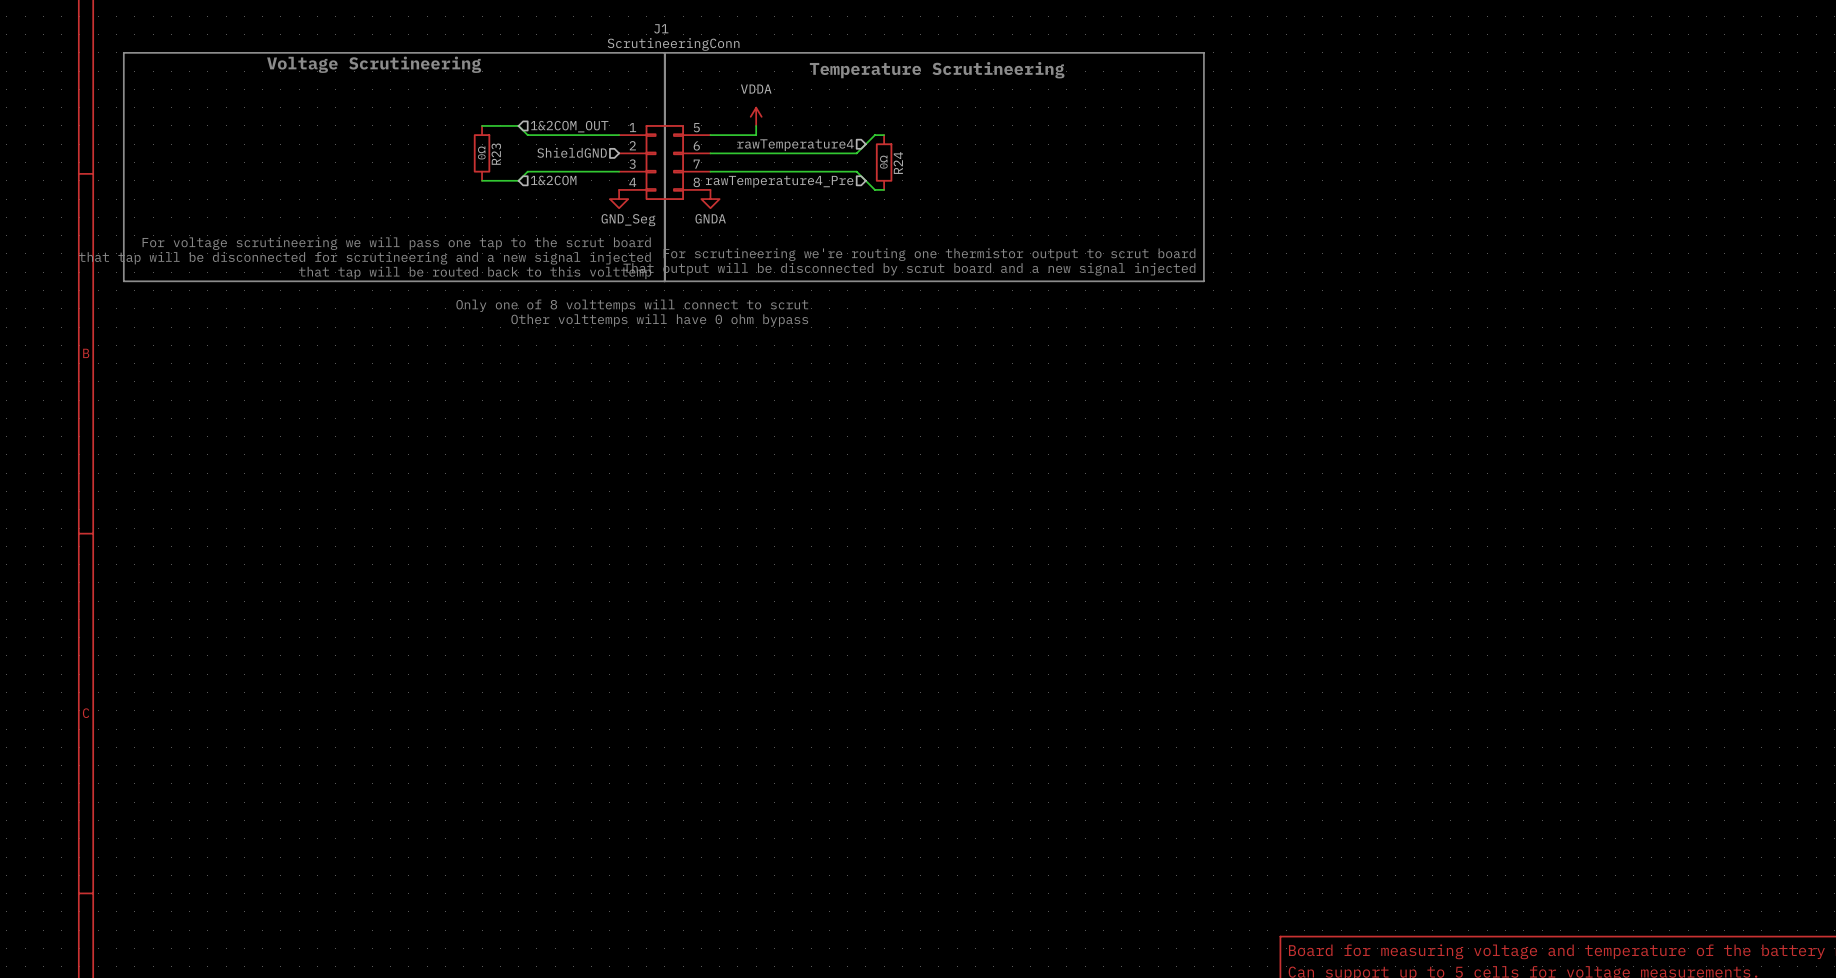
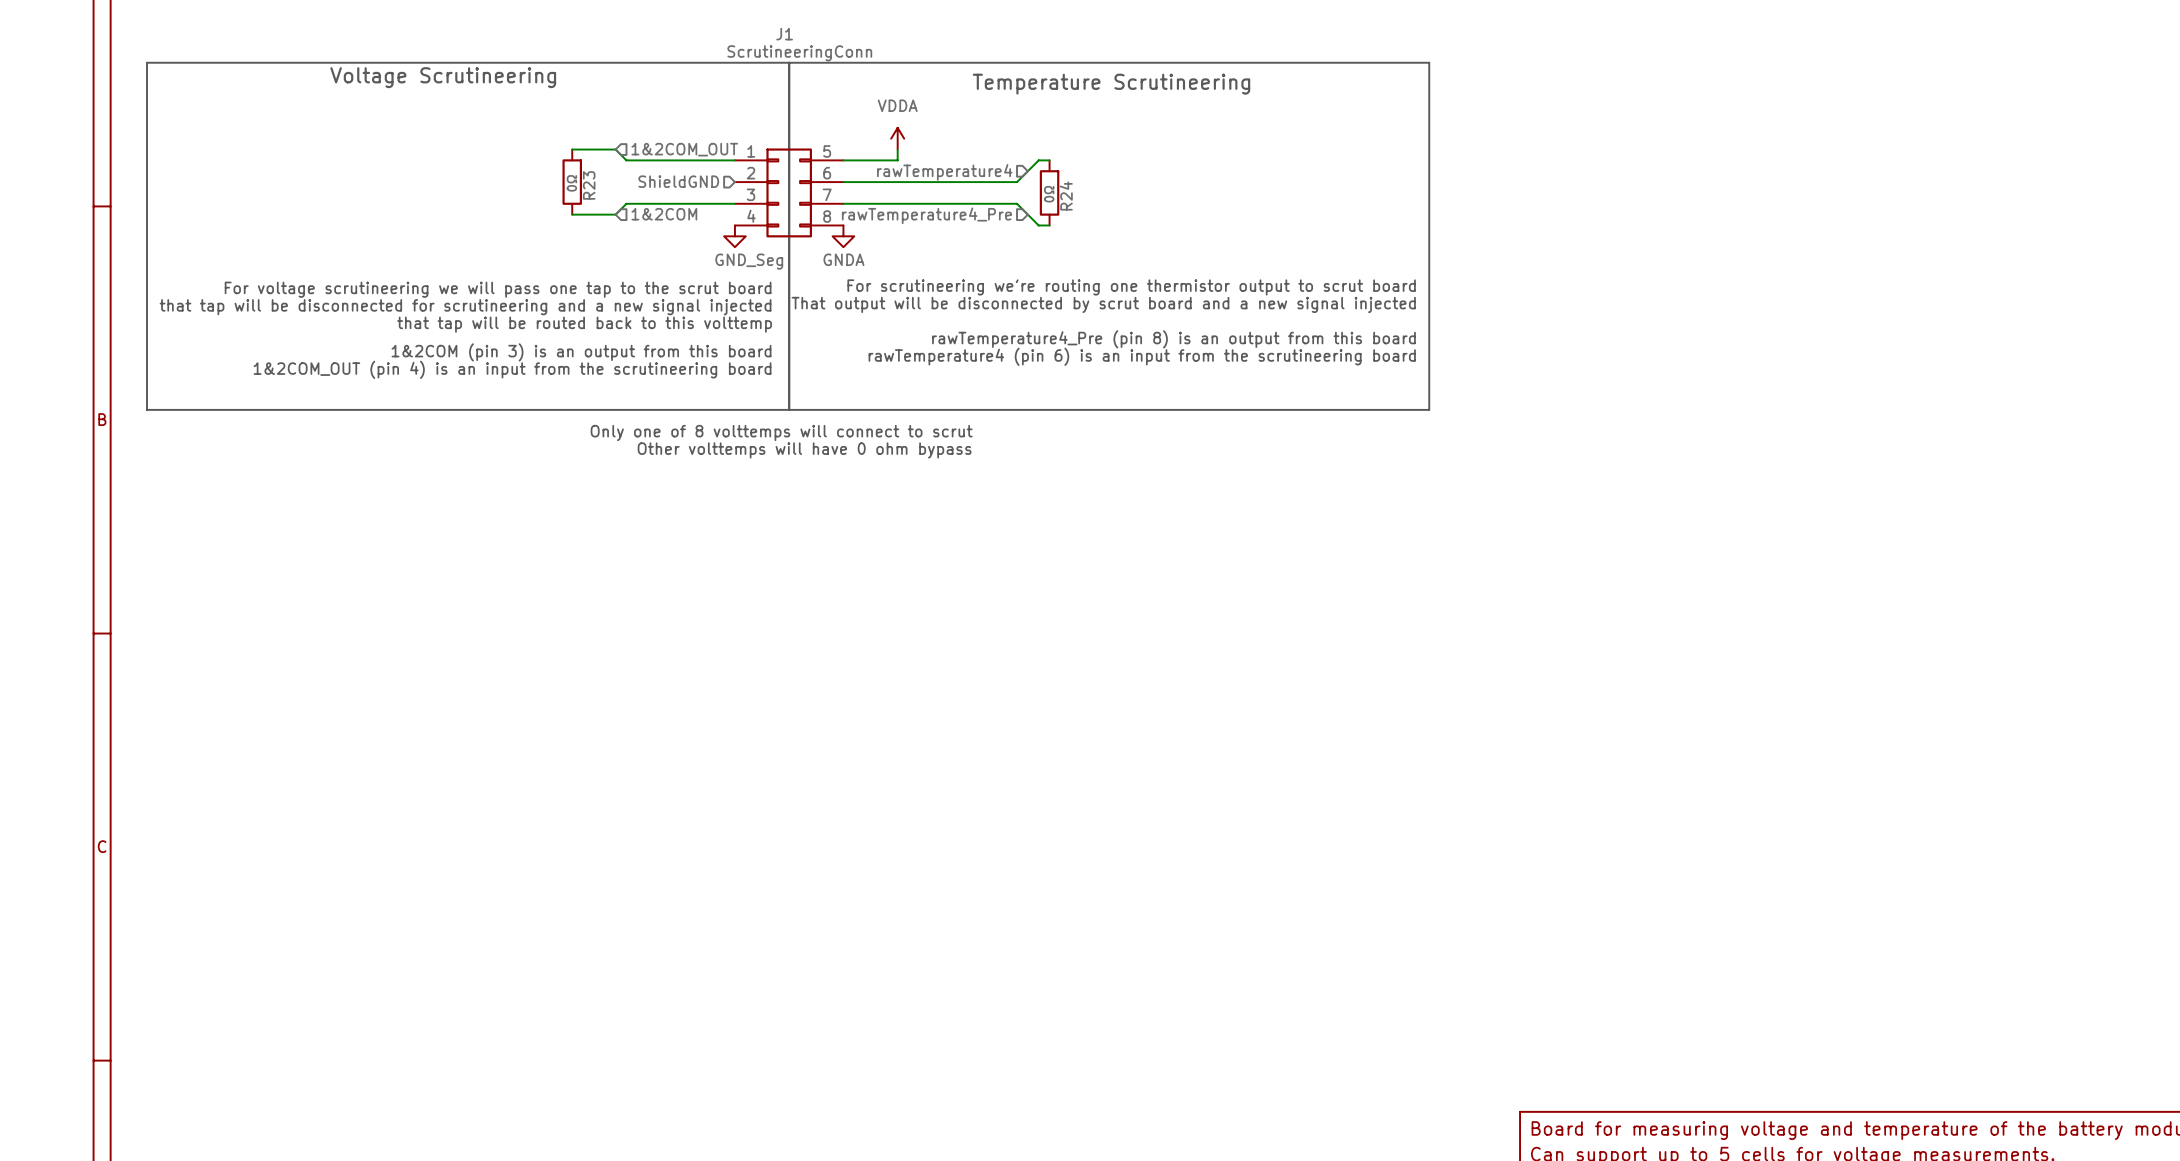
text position: For scrutineering we're routing one thermistor output to scrut board (929, 254) -> For scrutineering we're routing one thermistor output to scrut board (1131, 287)
text position: That output will be disconnected by scrut board and a new signal injected (909, 269) -> That output will be disconnected by scrut board and a new signal injected (1103, 304)
line: (123, 281) (1203, 281) -> (146, 333) (146, 409) (1429, 409) (1429, 333)
line: none -> (789, 333) (789, 409)
text: none -> rawTemperature4_Pre (pin 8) is an output from this board (1173, 339)
text: none -> 1&2COM (pin 3) is an output from this board (581, 352)
text: none -> rawTemperature4 (pin 6) is an input from the scrutineering board (1142, 356)
text position: Only one of 8 volttemps will connect to scrut (632, 305) -> Only one of 8 volttemps will connect to scrut (781, 432)
text: none -> 1&2COM_OUT (pin 4) is an input from the scrutineering board (512, 369)
text position: Other volttemps will have 0 ohm bypass (659, 320) -> Other volttemps will have 0 ohm bypass (804, 450)

